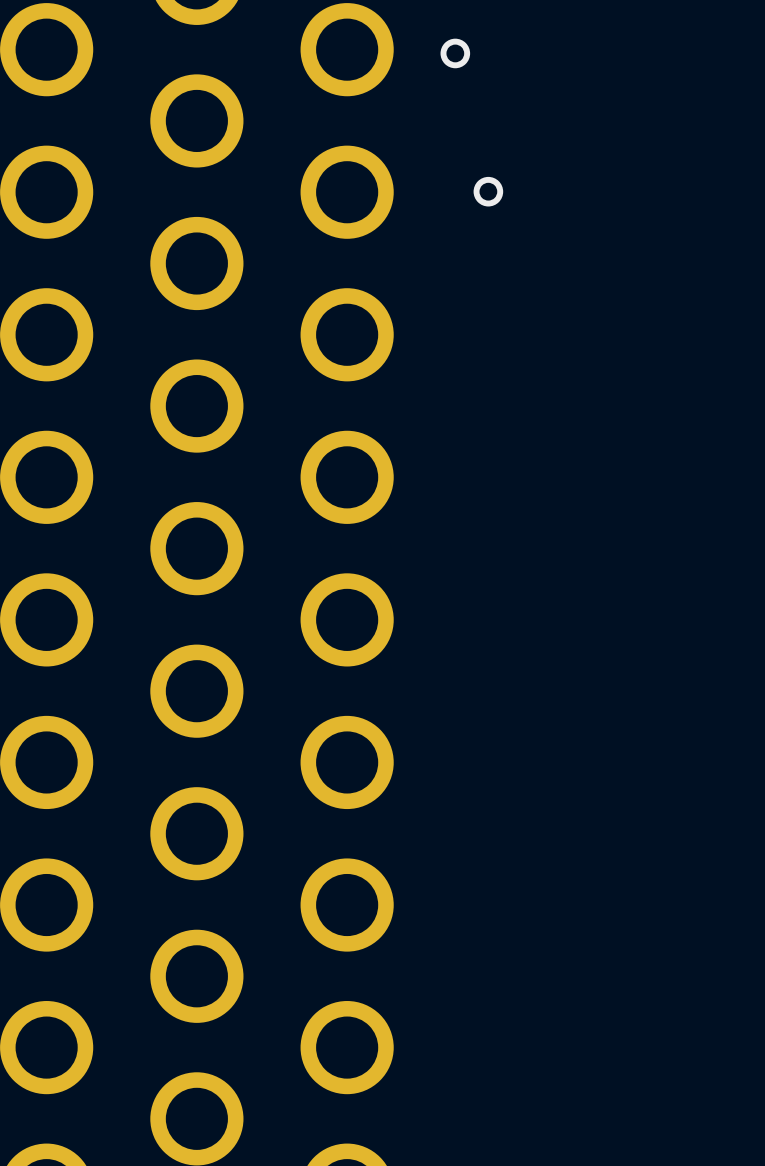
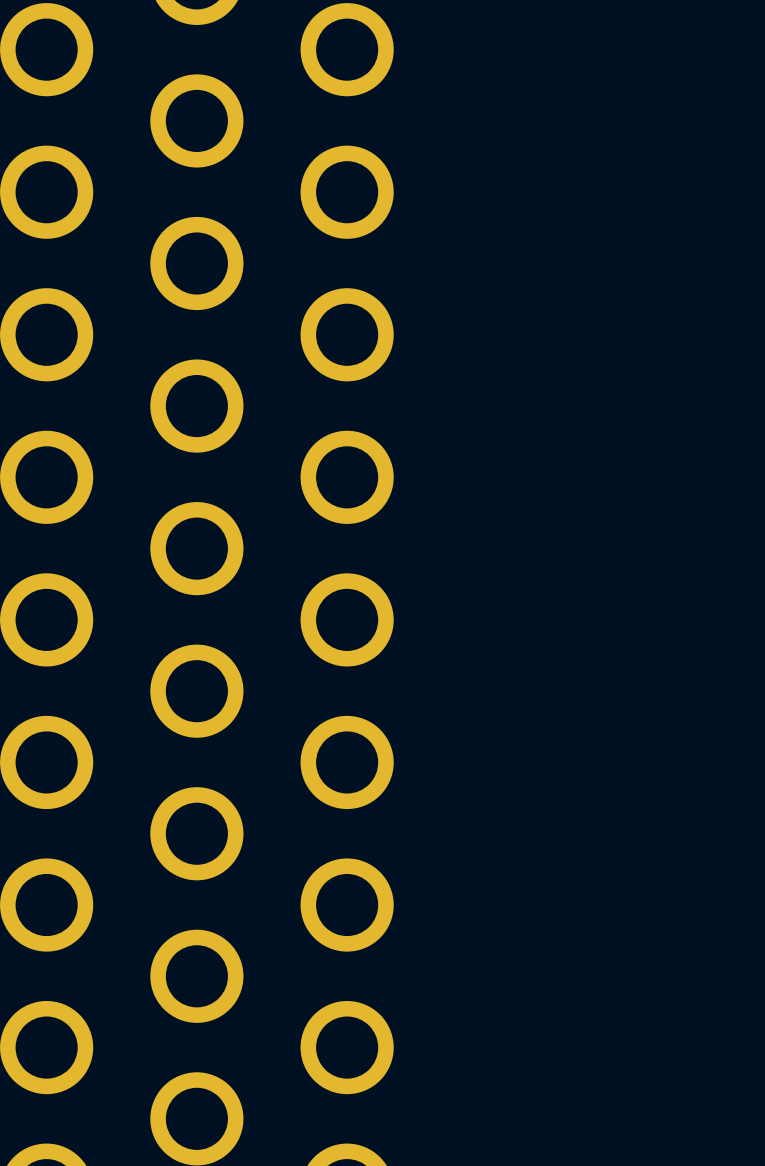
via: (455, 53) -> none
via: (488, 191) -> none

